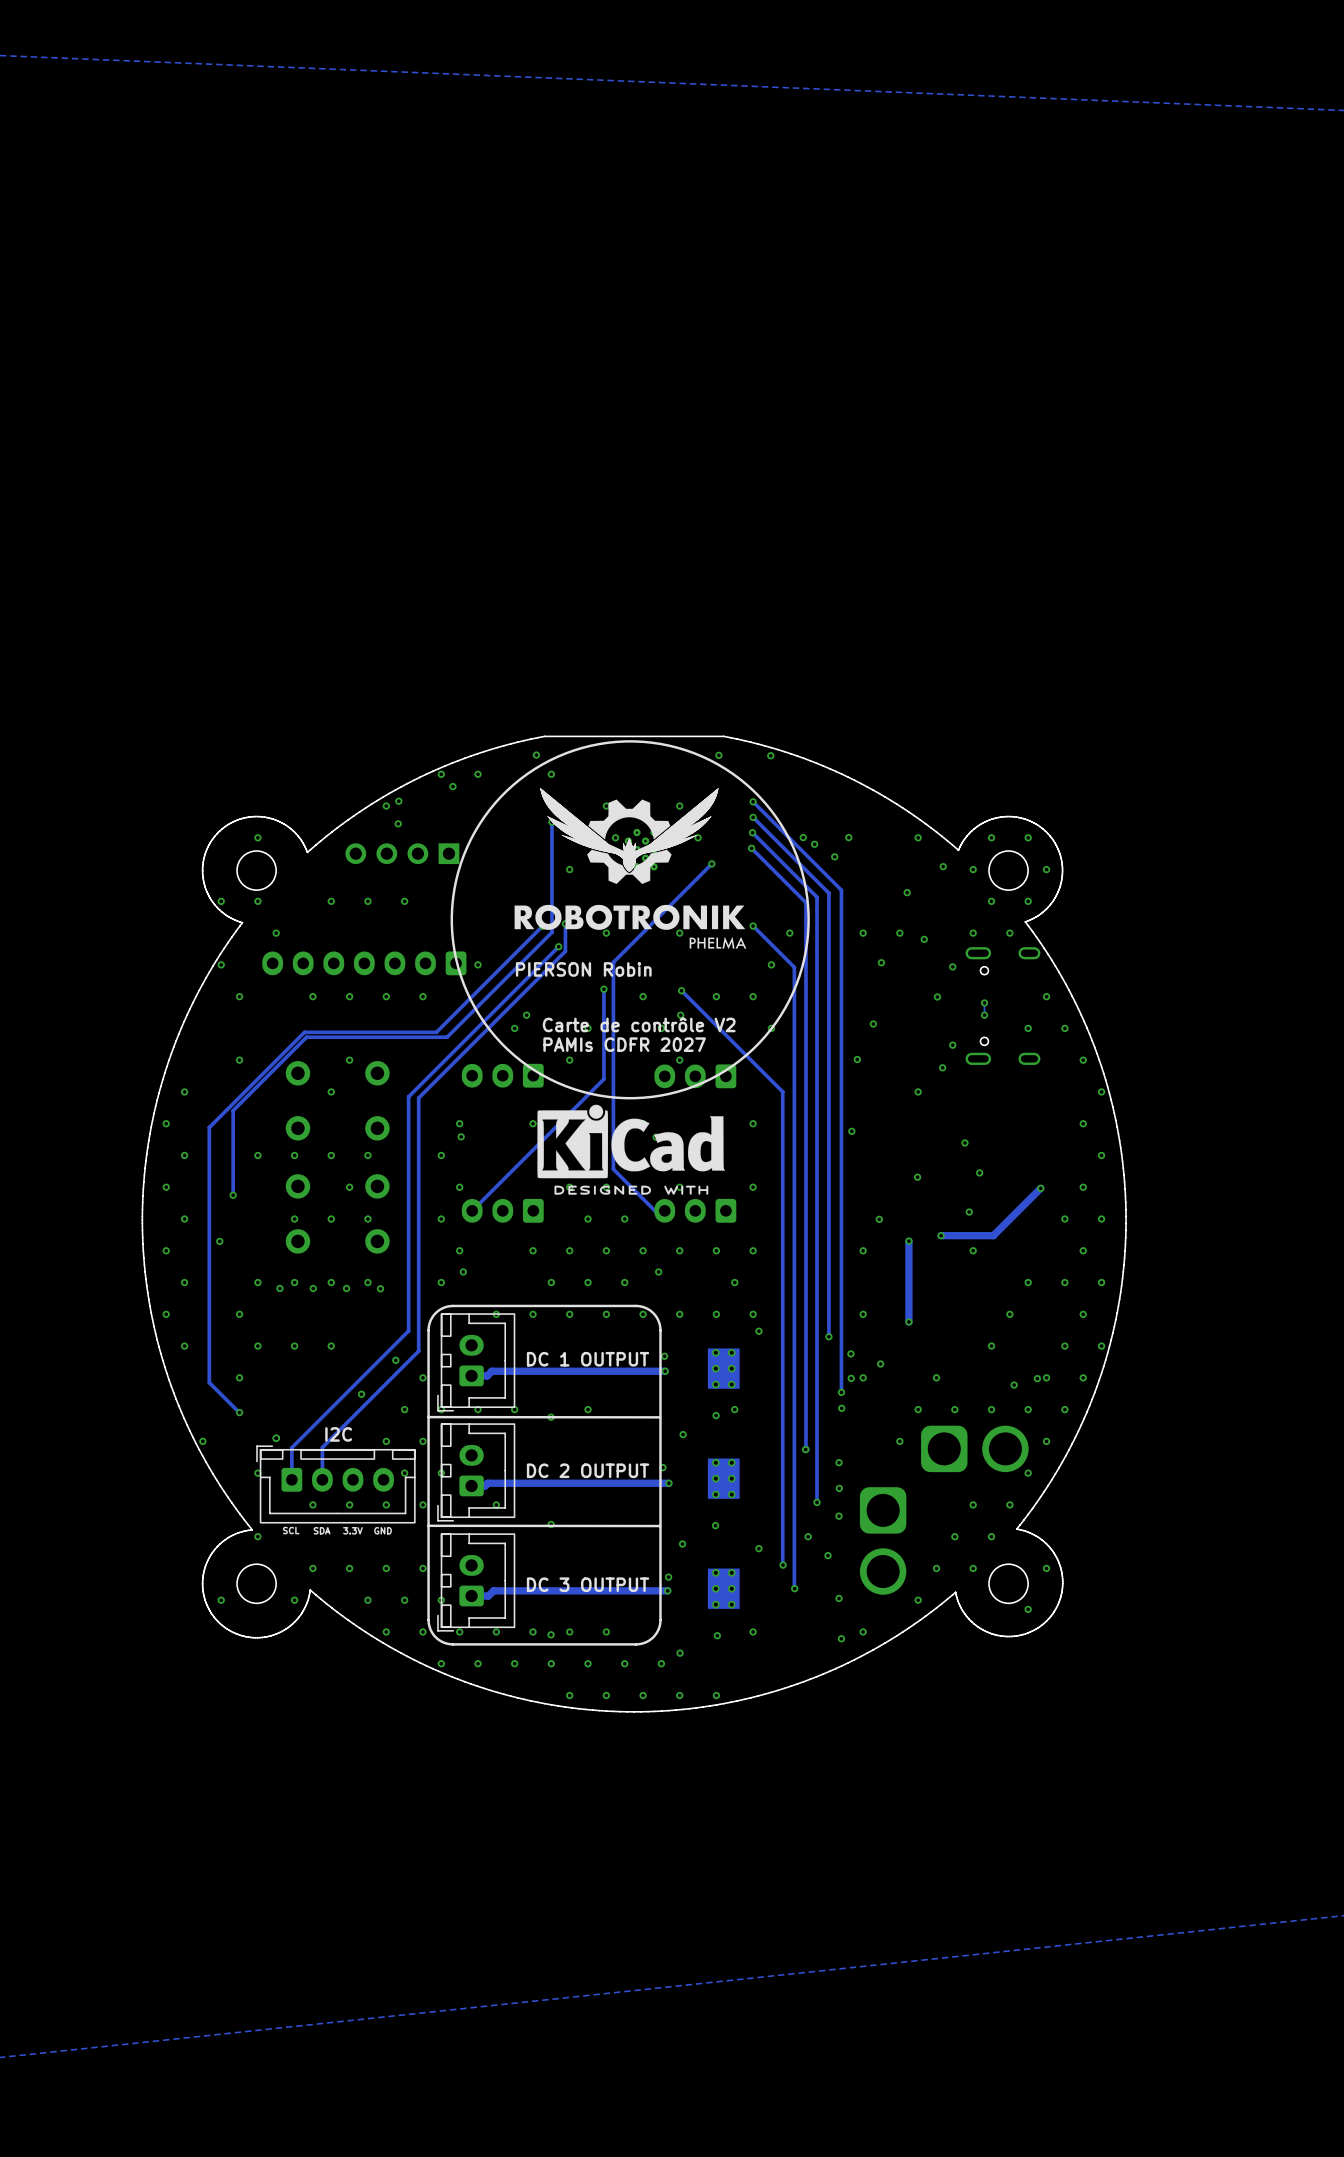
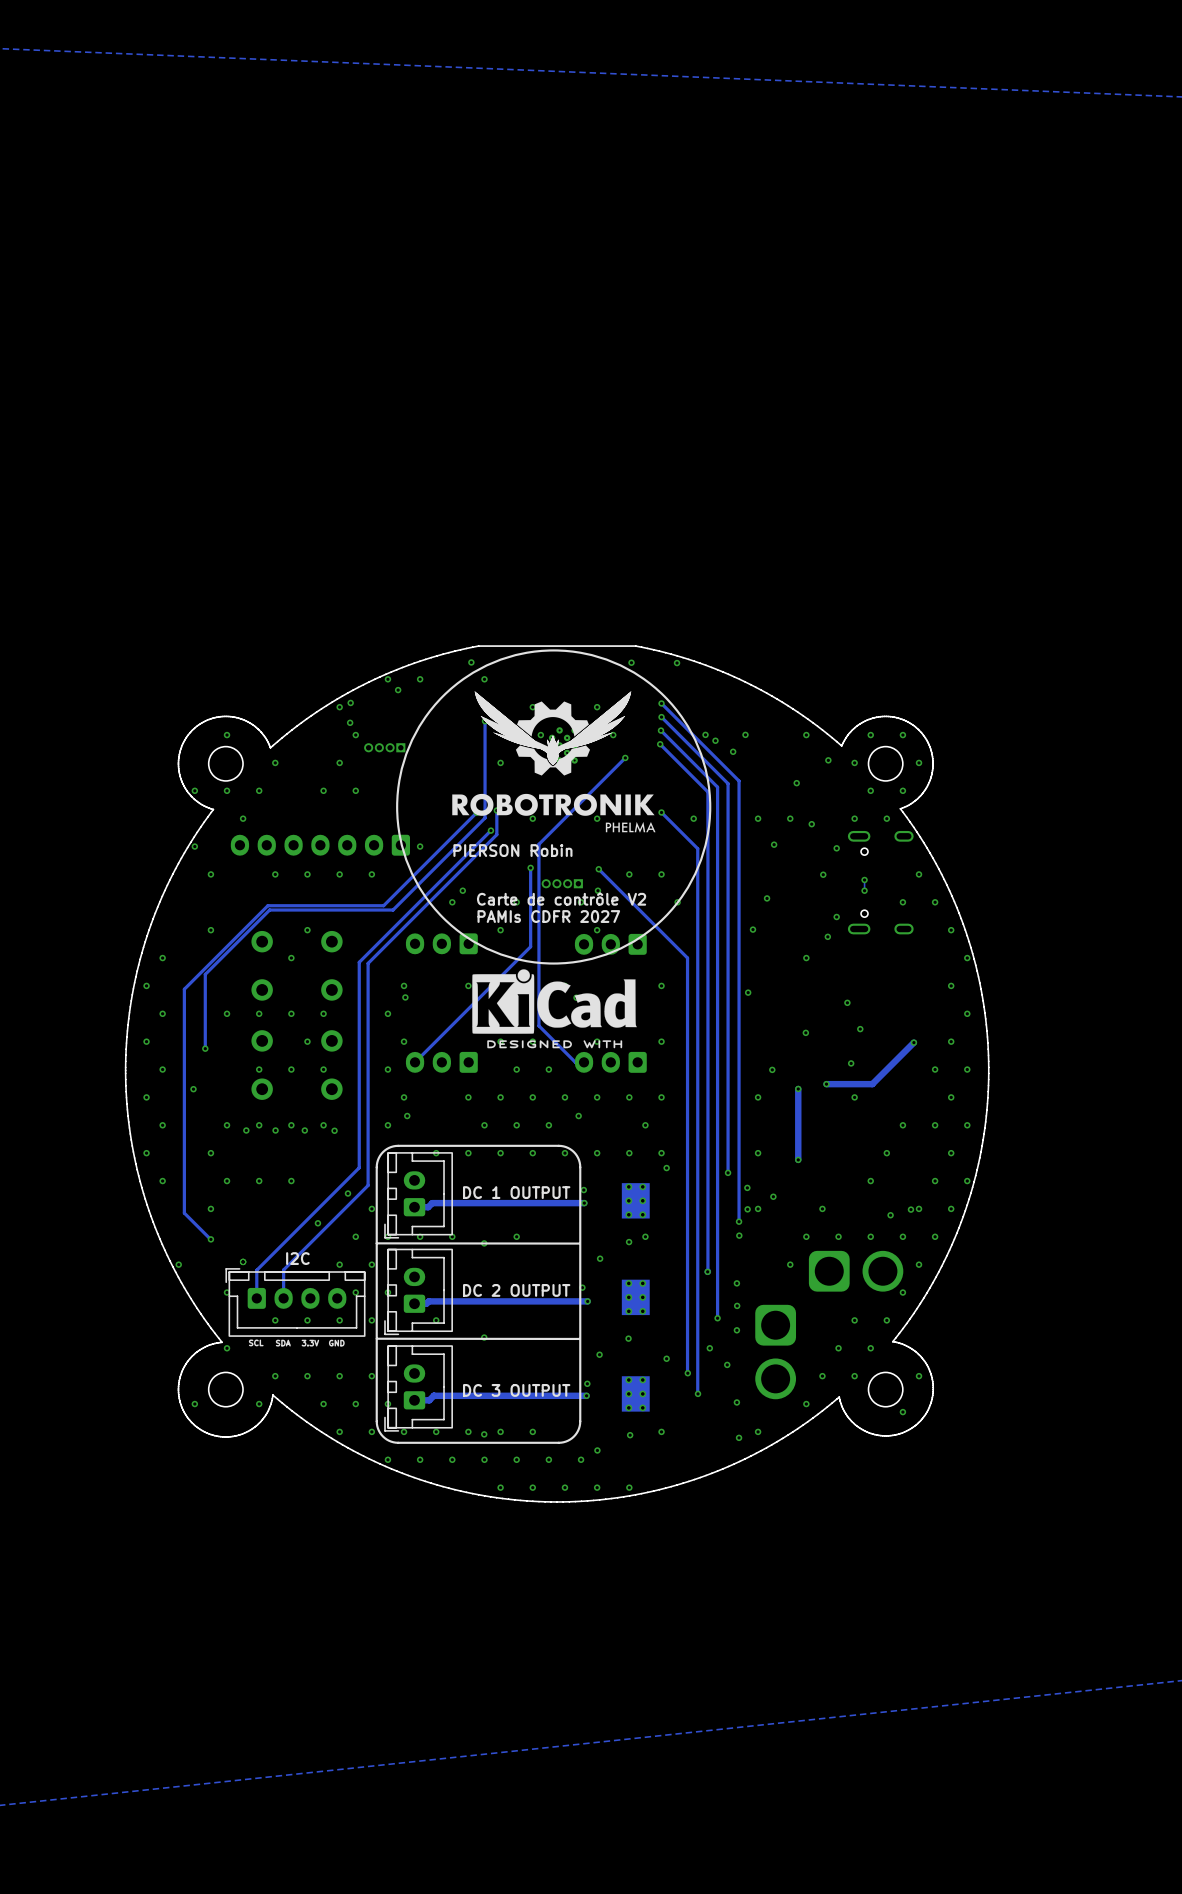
via: none -> (355, 735)
part: none -> (384, 747)
part: (402, 853) -> none
via: none -> (275, 762)
via: none -> (339, 762)
via: none -> (259, 790)
via: (331, 901) -> none
via: (771, 964) -> none
via: (643, 996) -> none
part: none -> (562, 883)

